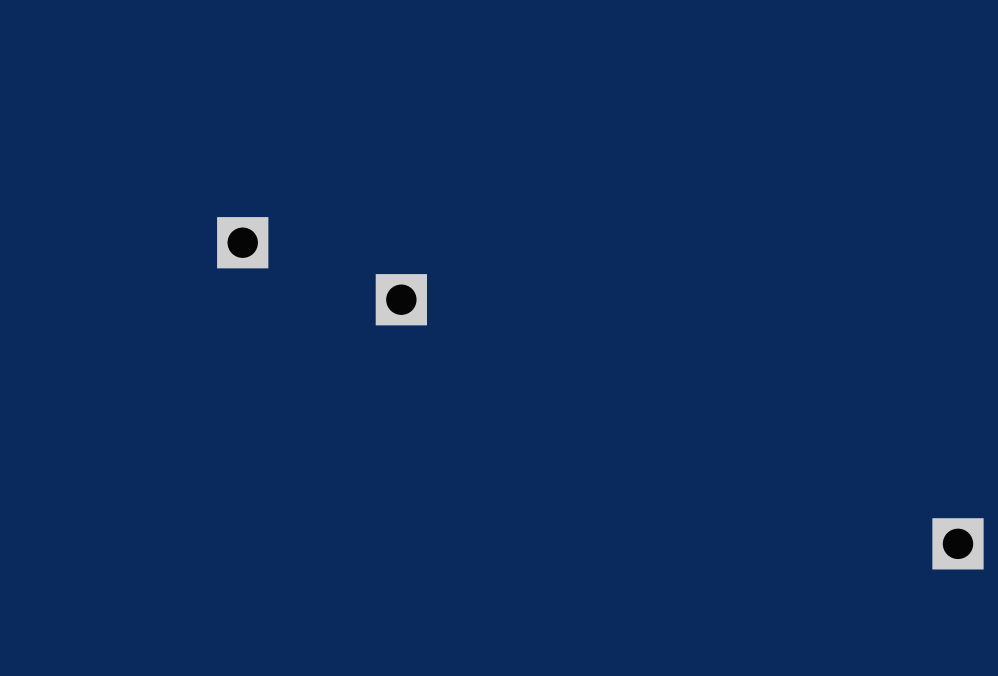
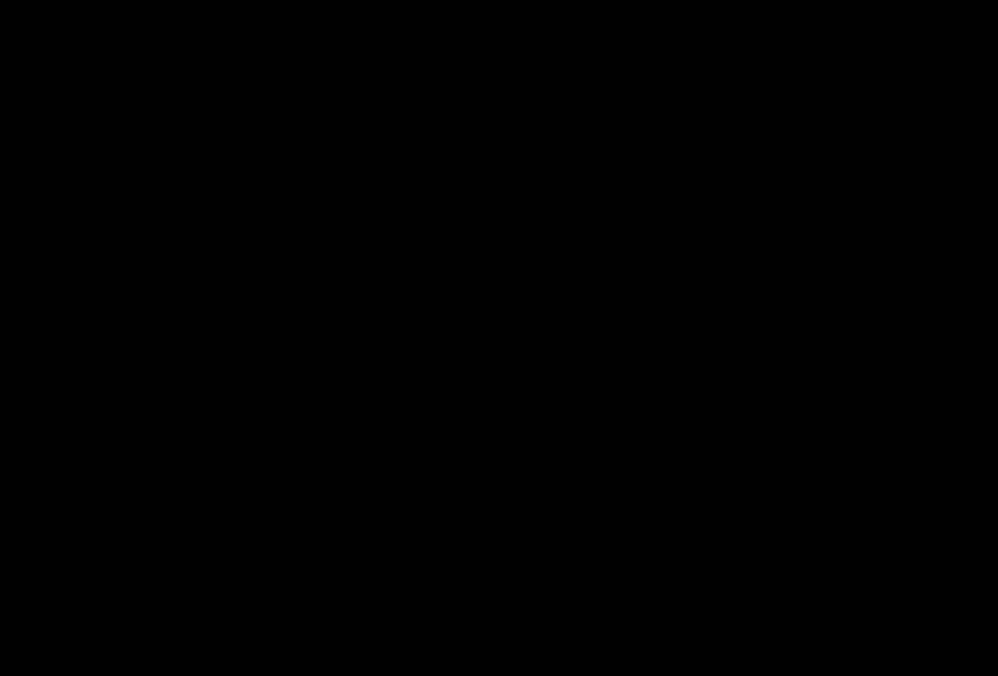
part: (242, 242) -> none
part: (401, 299) -> none
part: (957, 543) -> none

